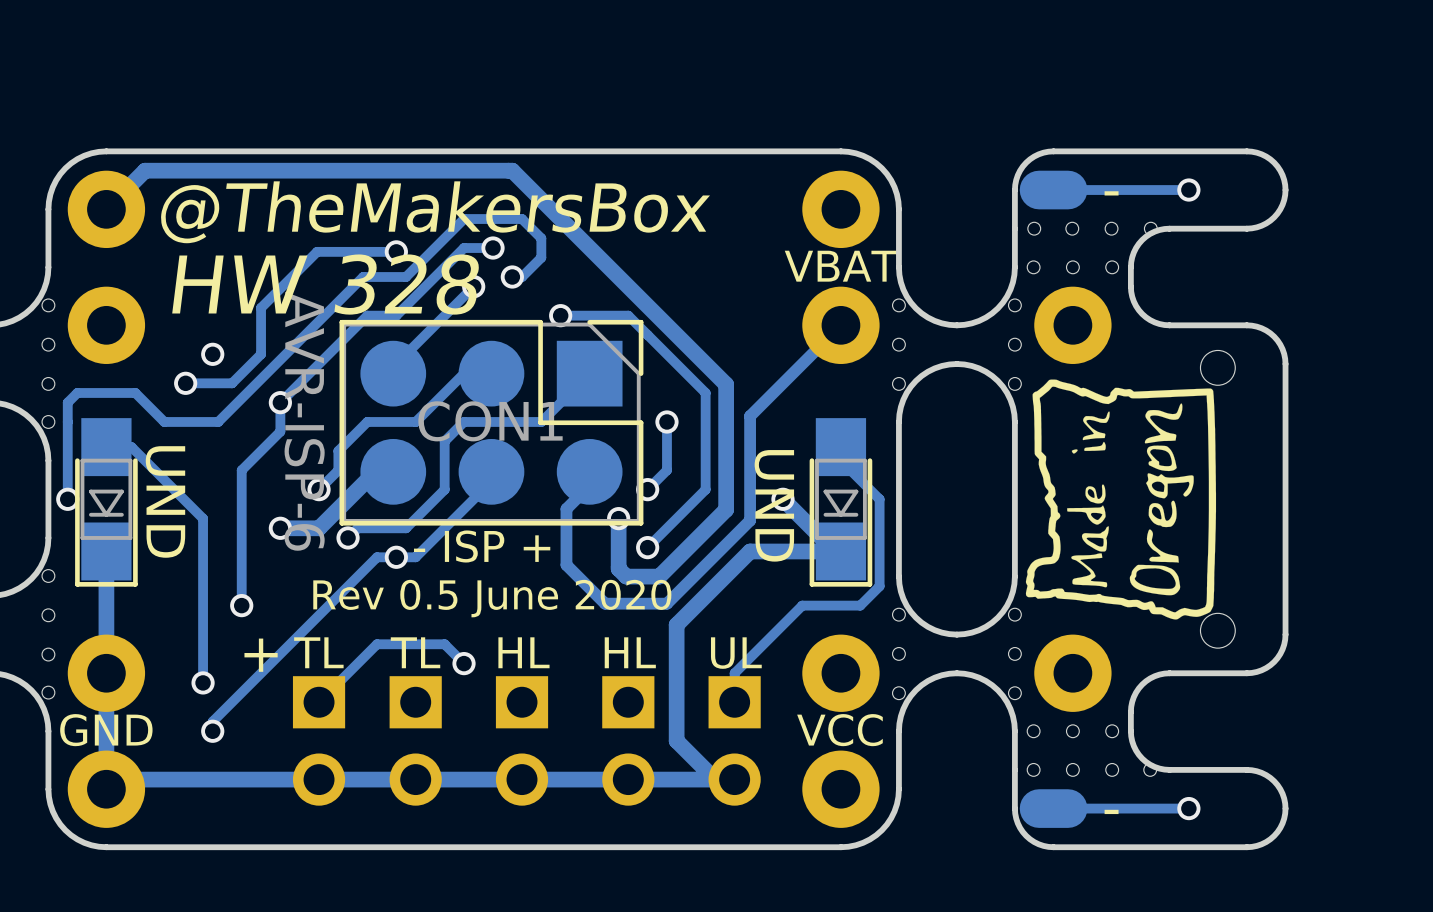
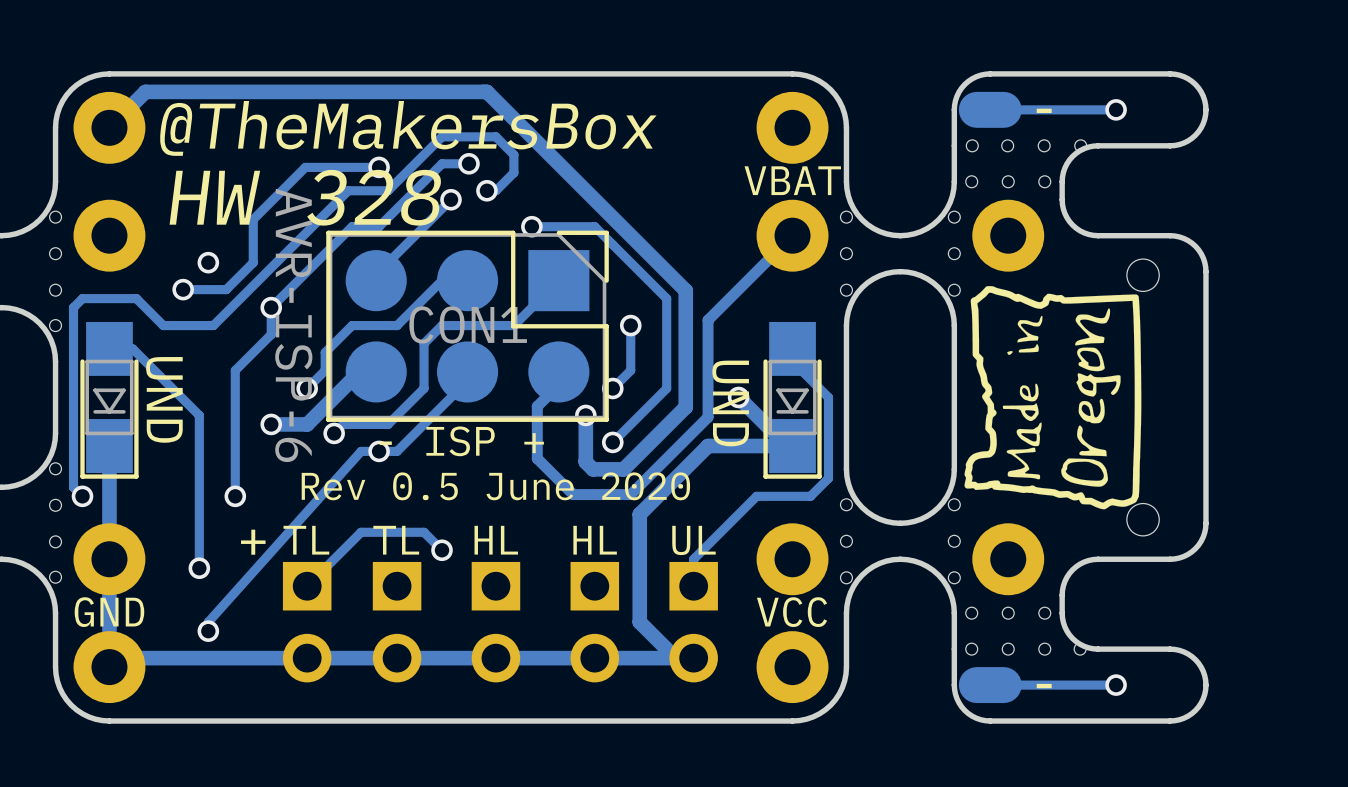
track: none -> (73, 397) (73, 487) (82, 496)
via: (67, 499) -> none
track: (377, 557) (212, 721) (212, 731) -> (361, 451) (208, 622) (208, 631)
via: none -> (82, 496)
via position: (212, 731) -> (208, 631)

